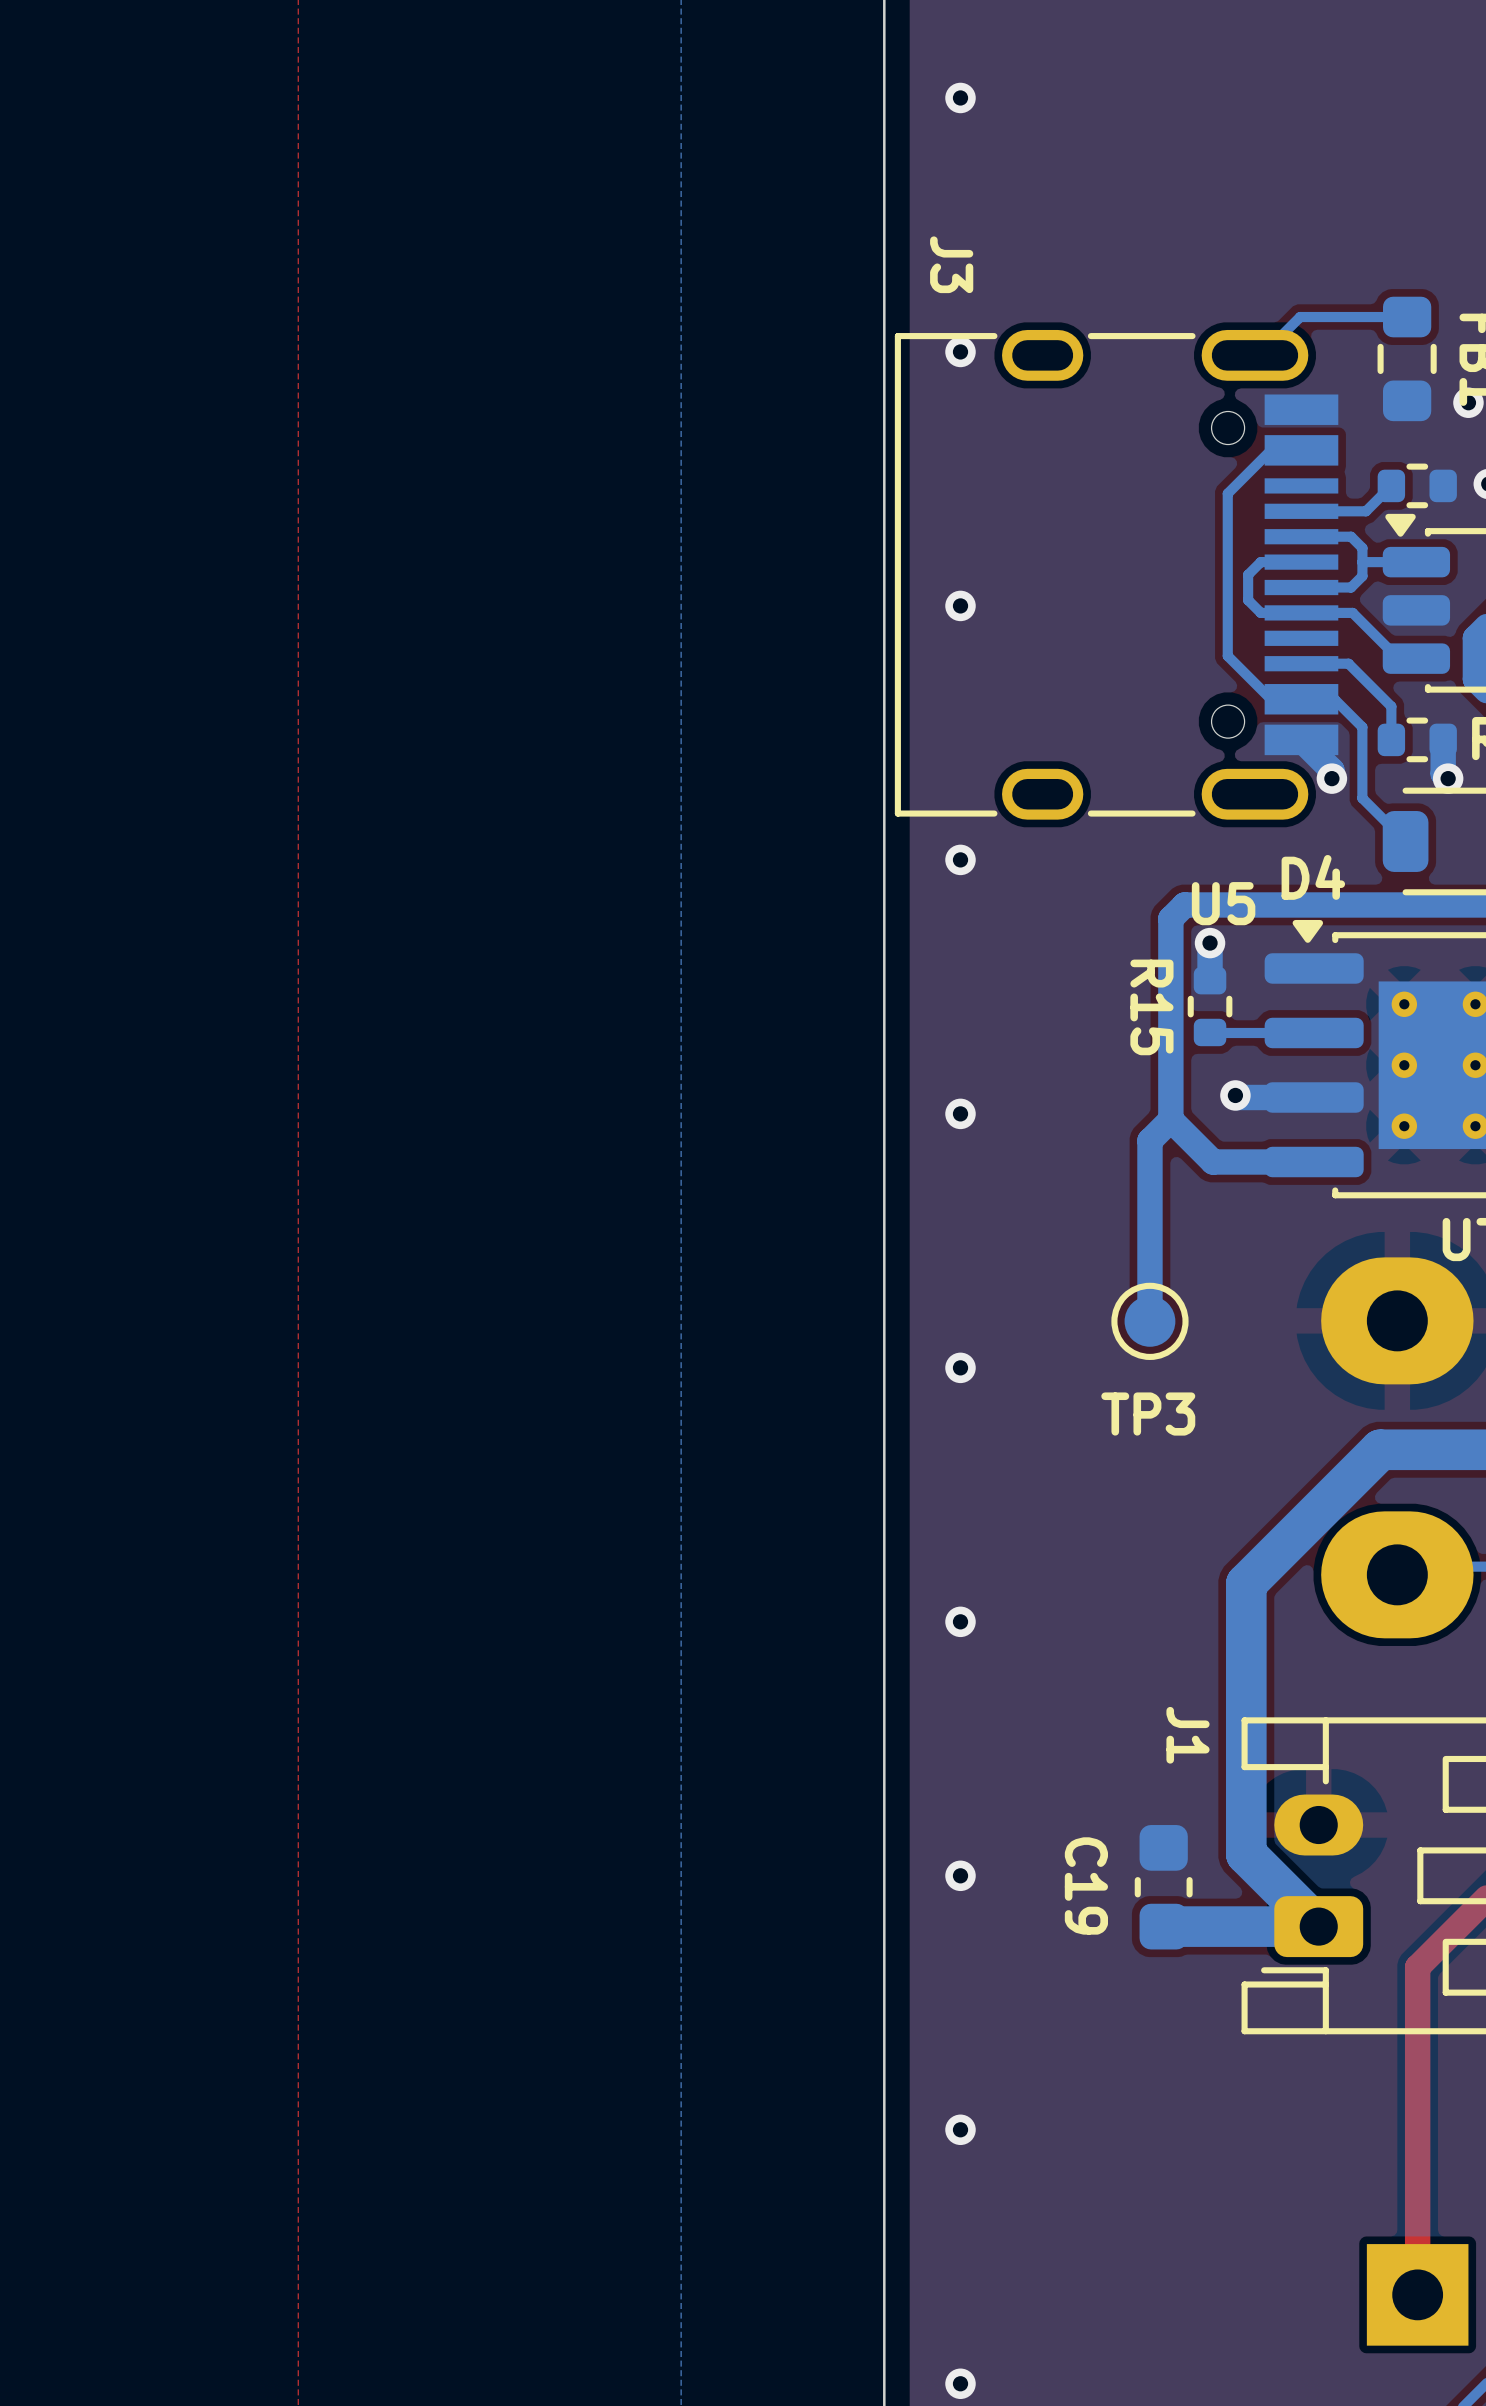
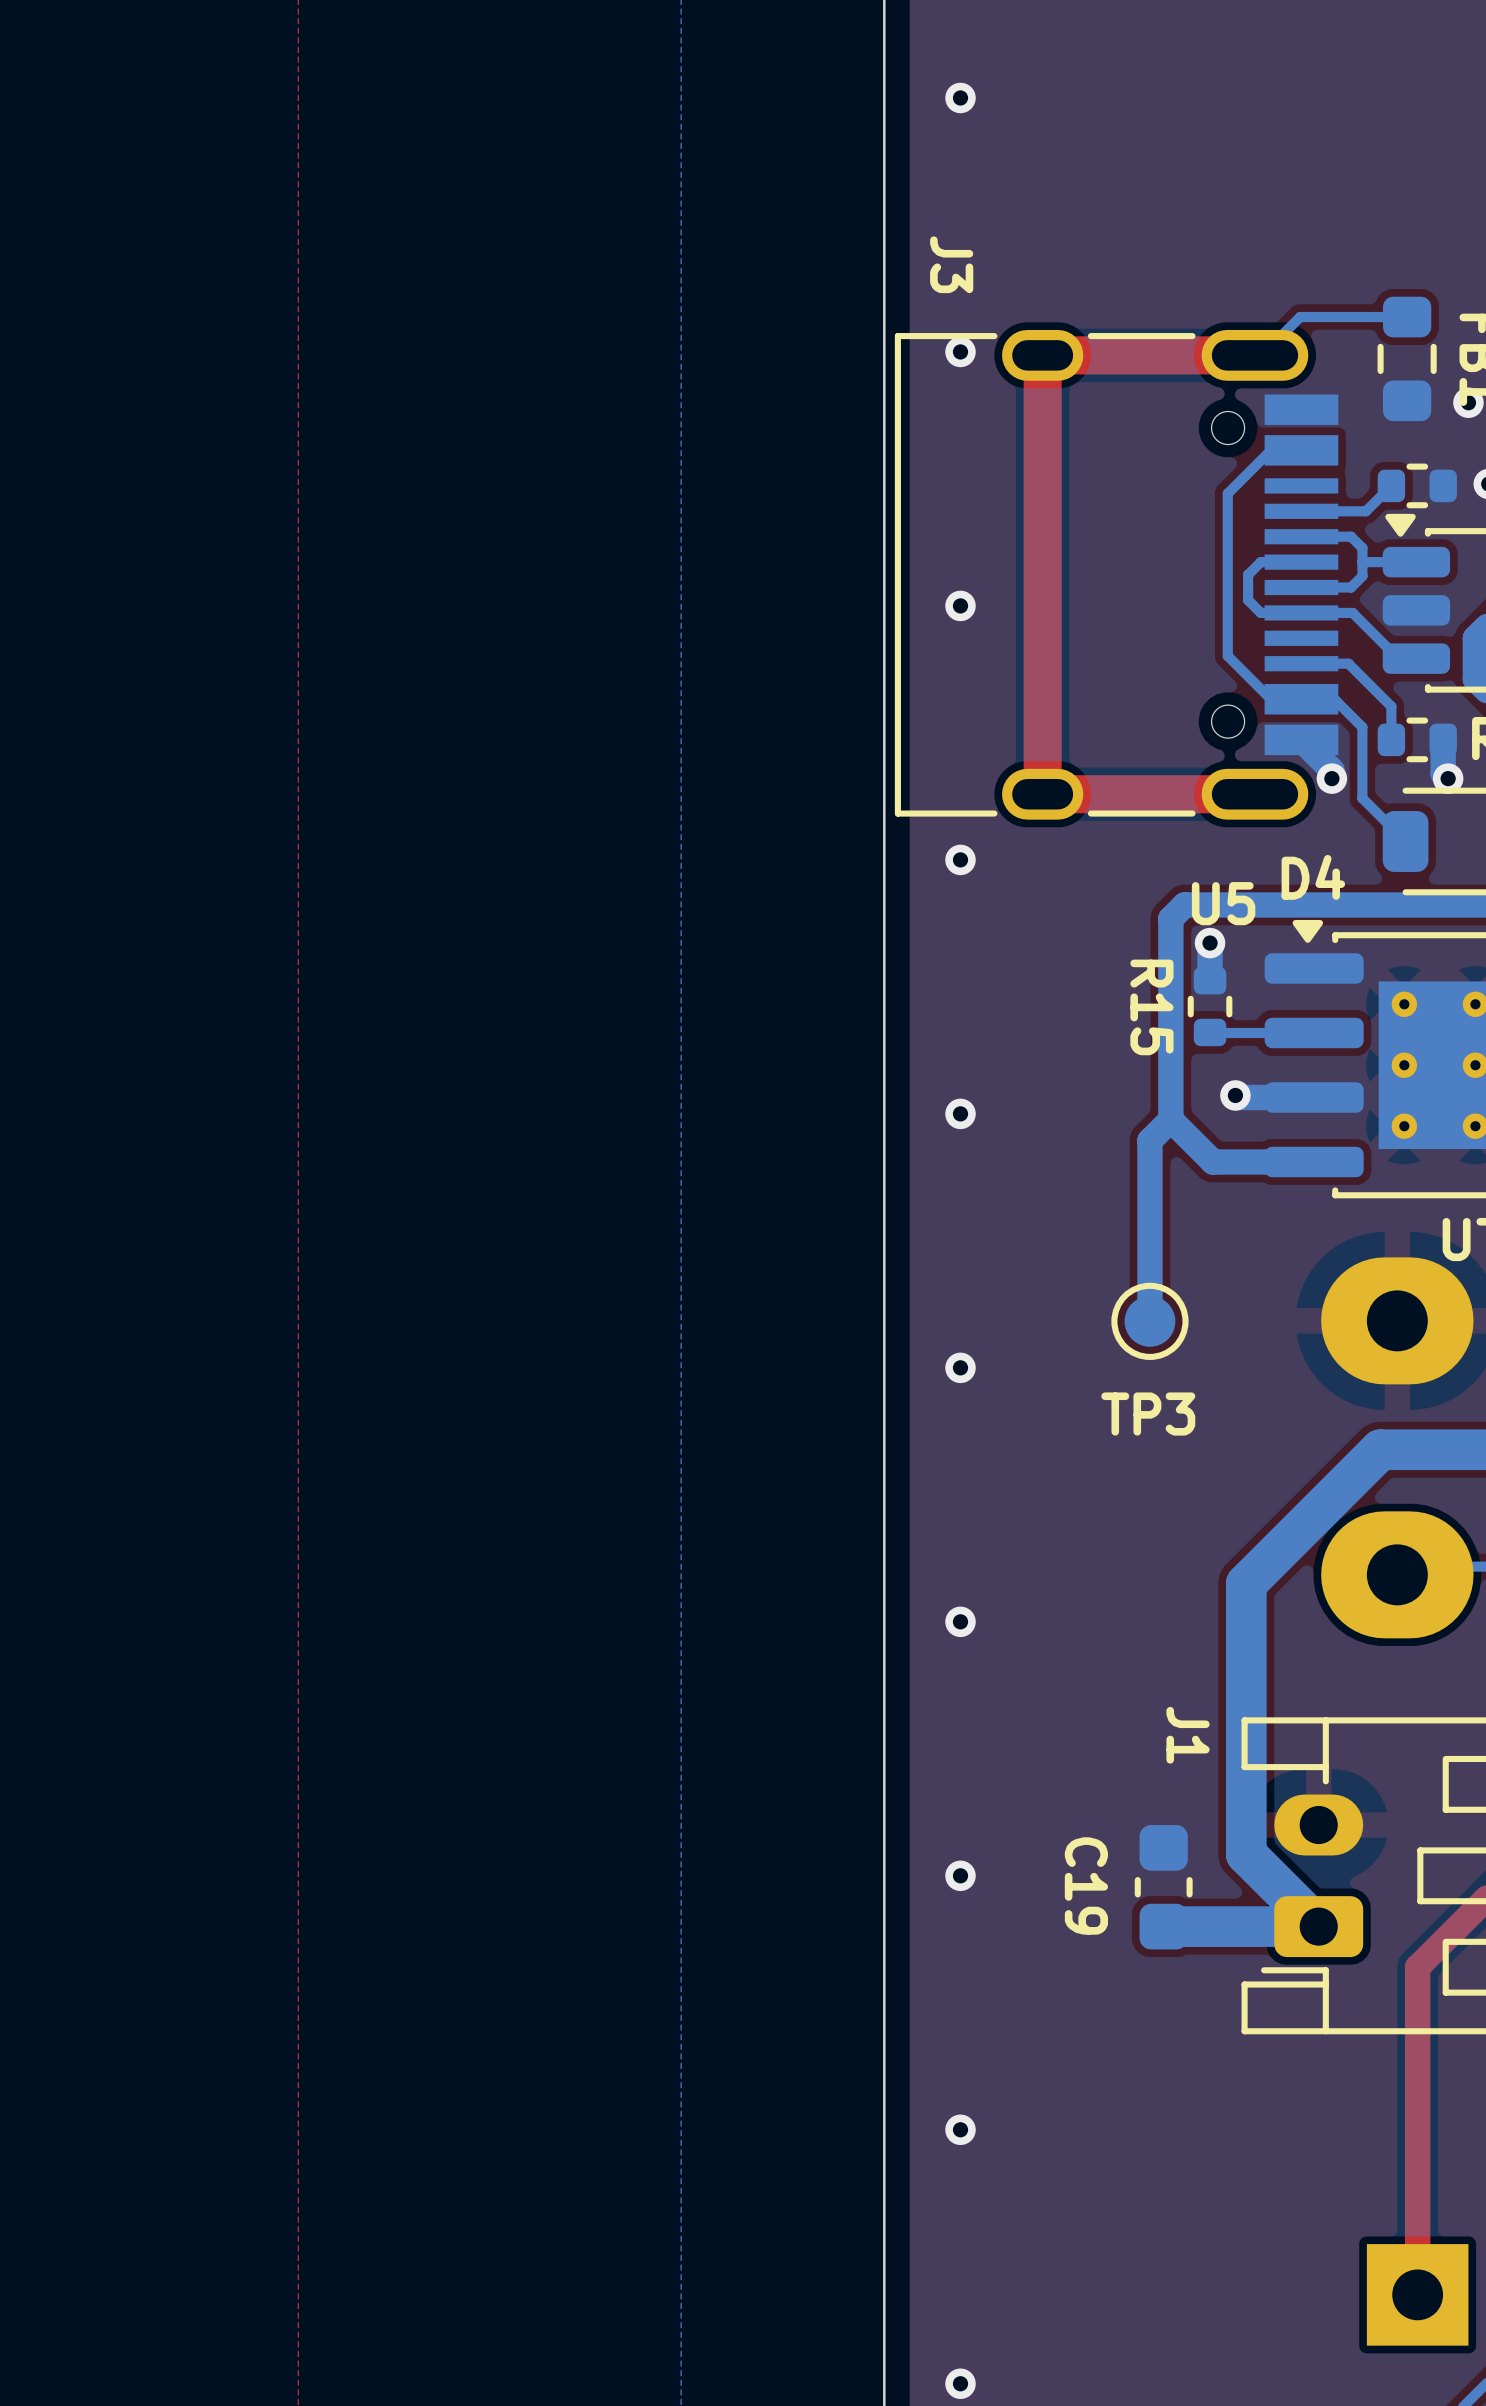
top track: none -> (1254, 355) (1042, 355) (1042, 794) (1254, 794)

